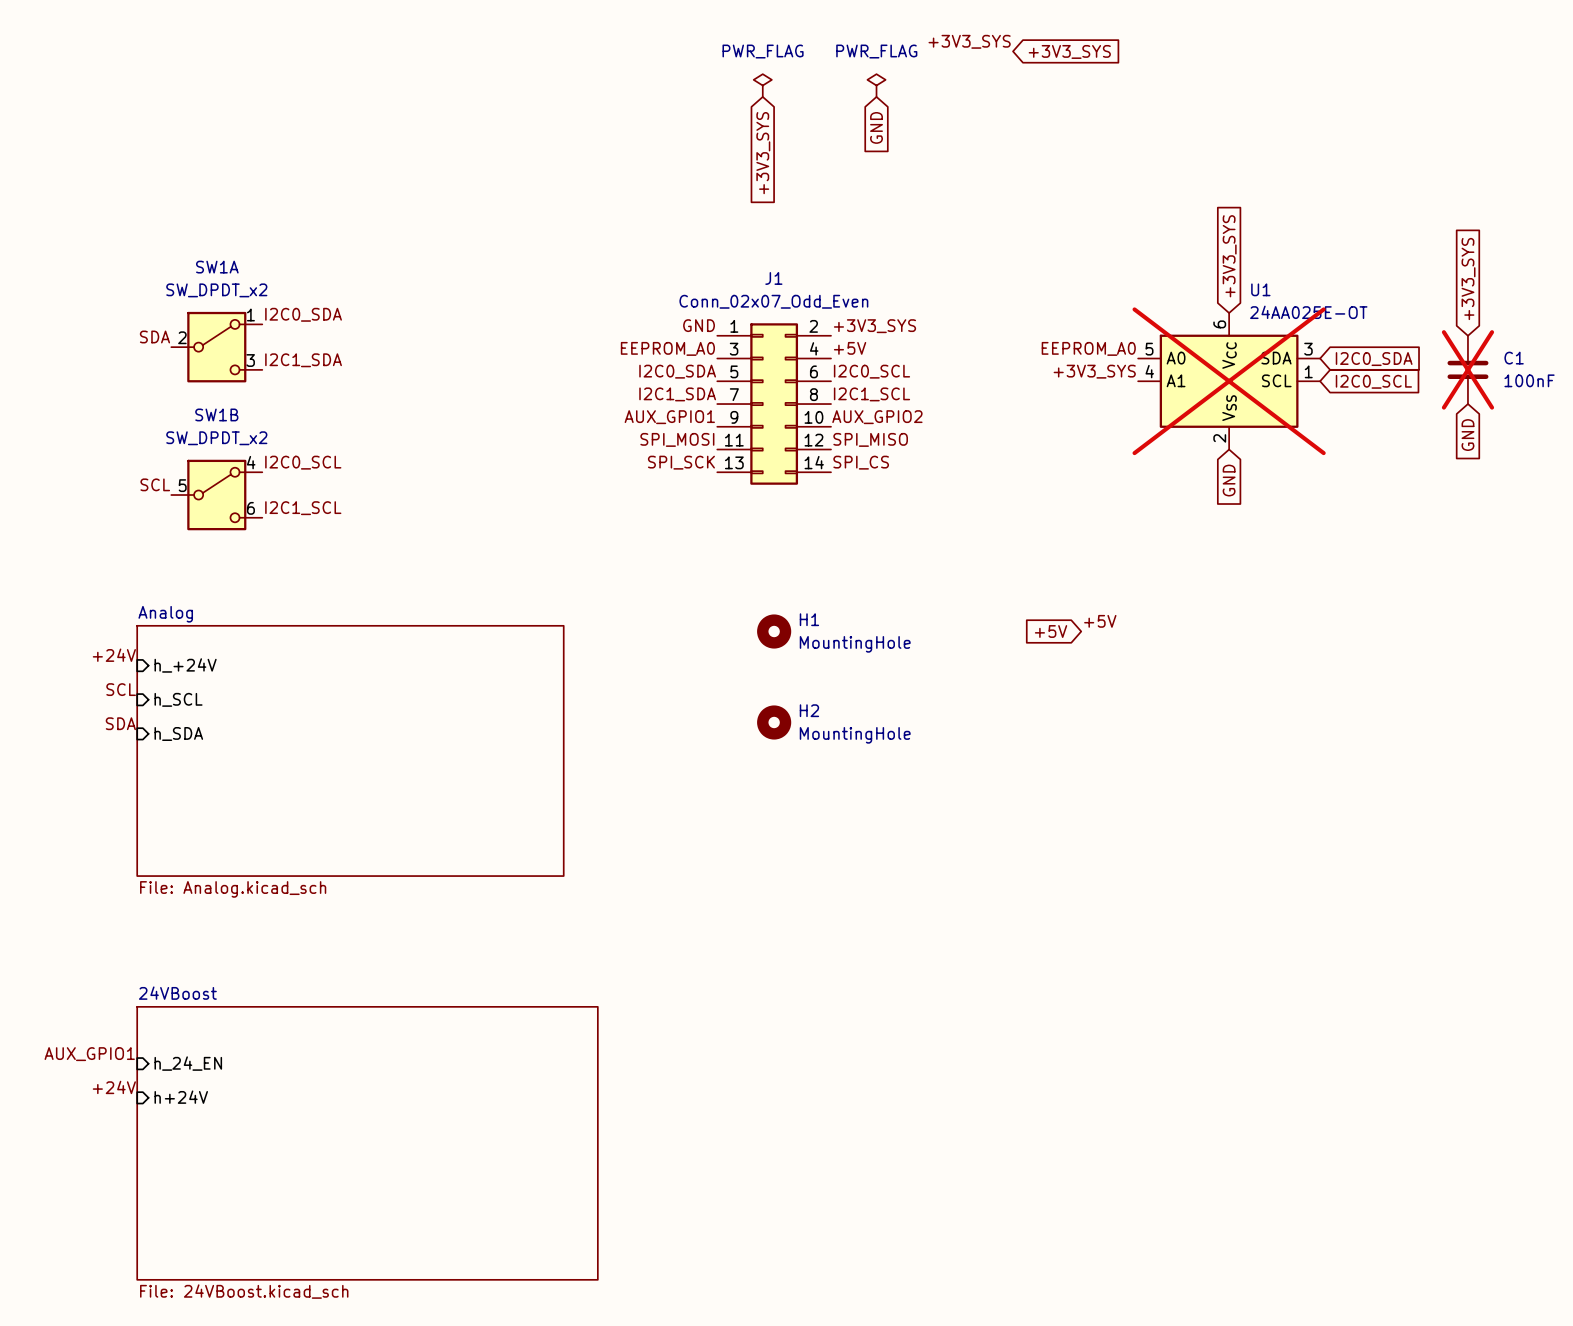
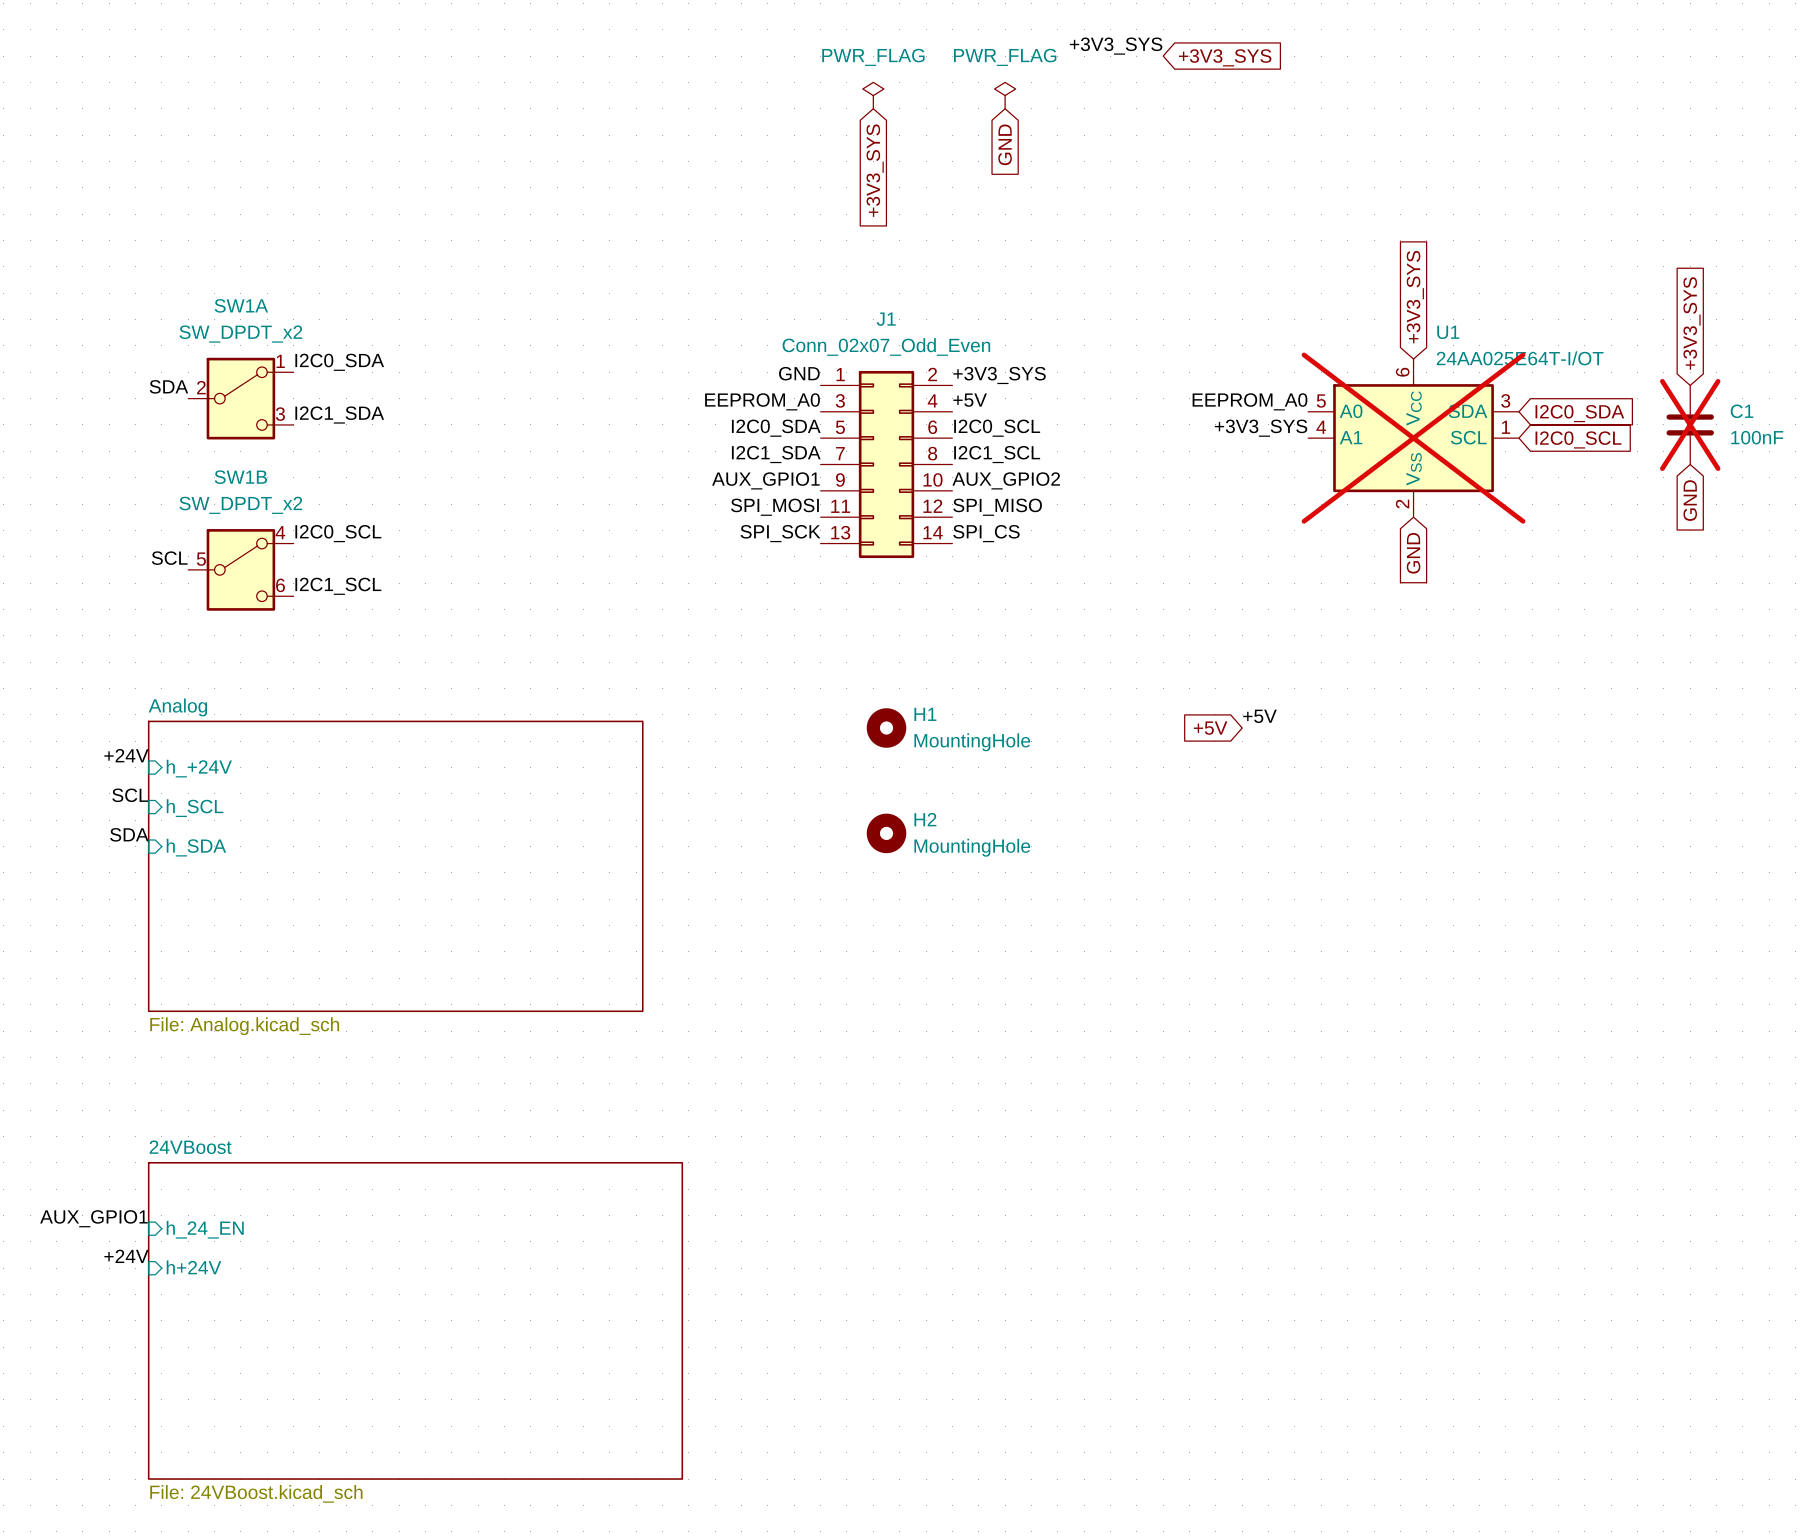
U1 value: 24AA025E-OT (1308, 312) -> 24AA025E64T-I/OT (1520, 358)

